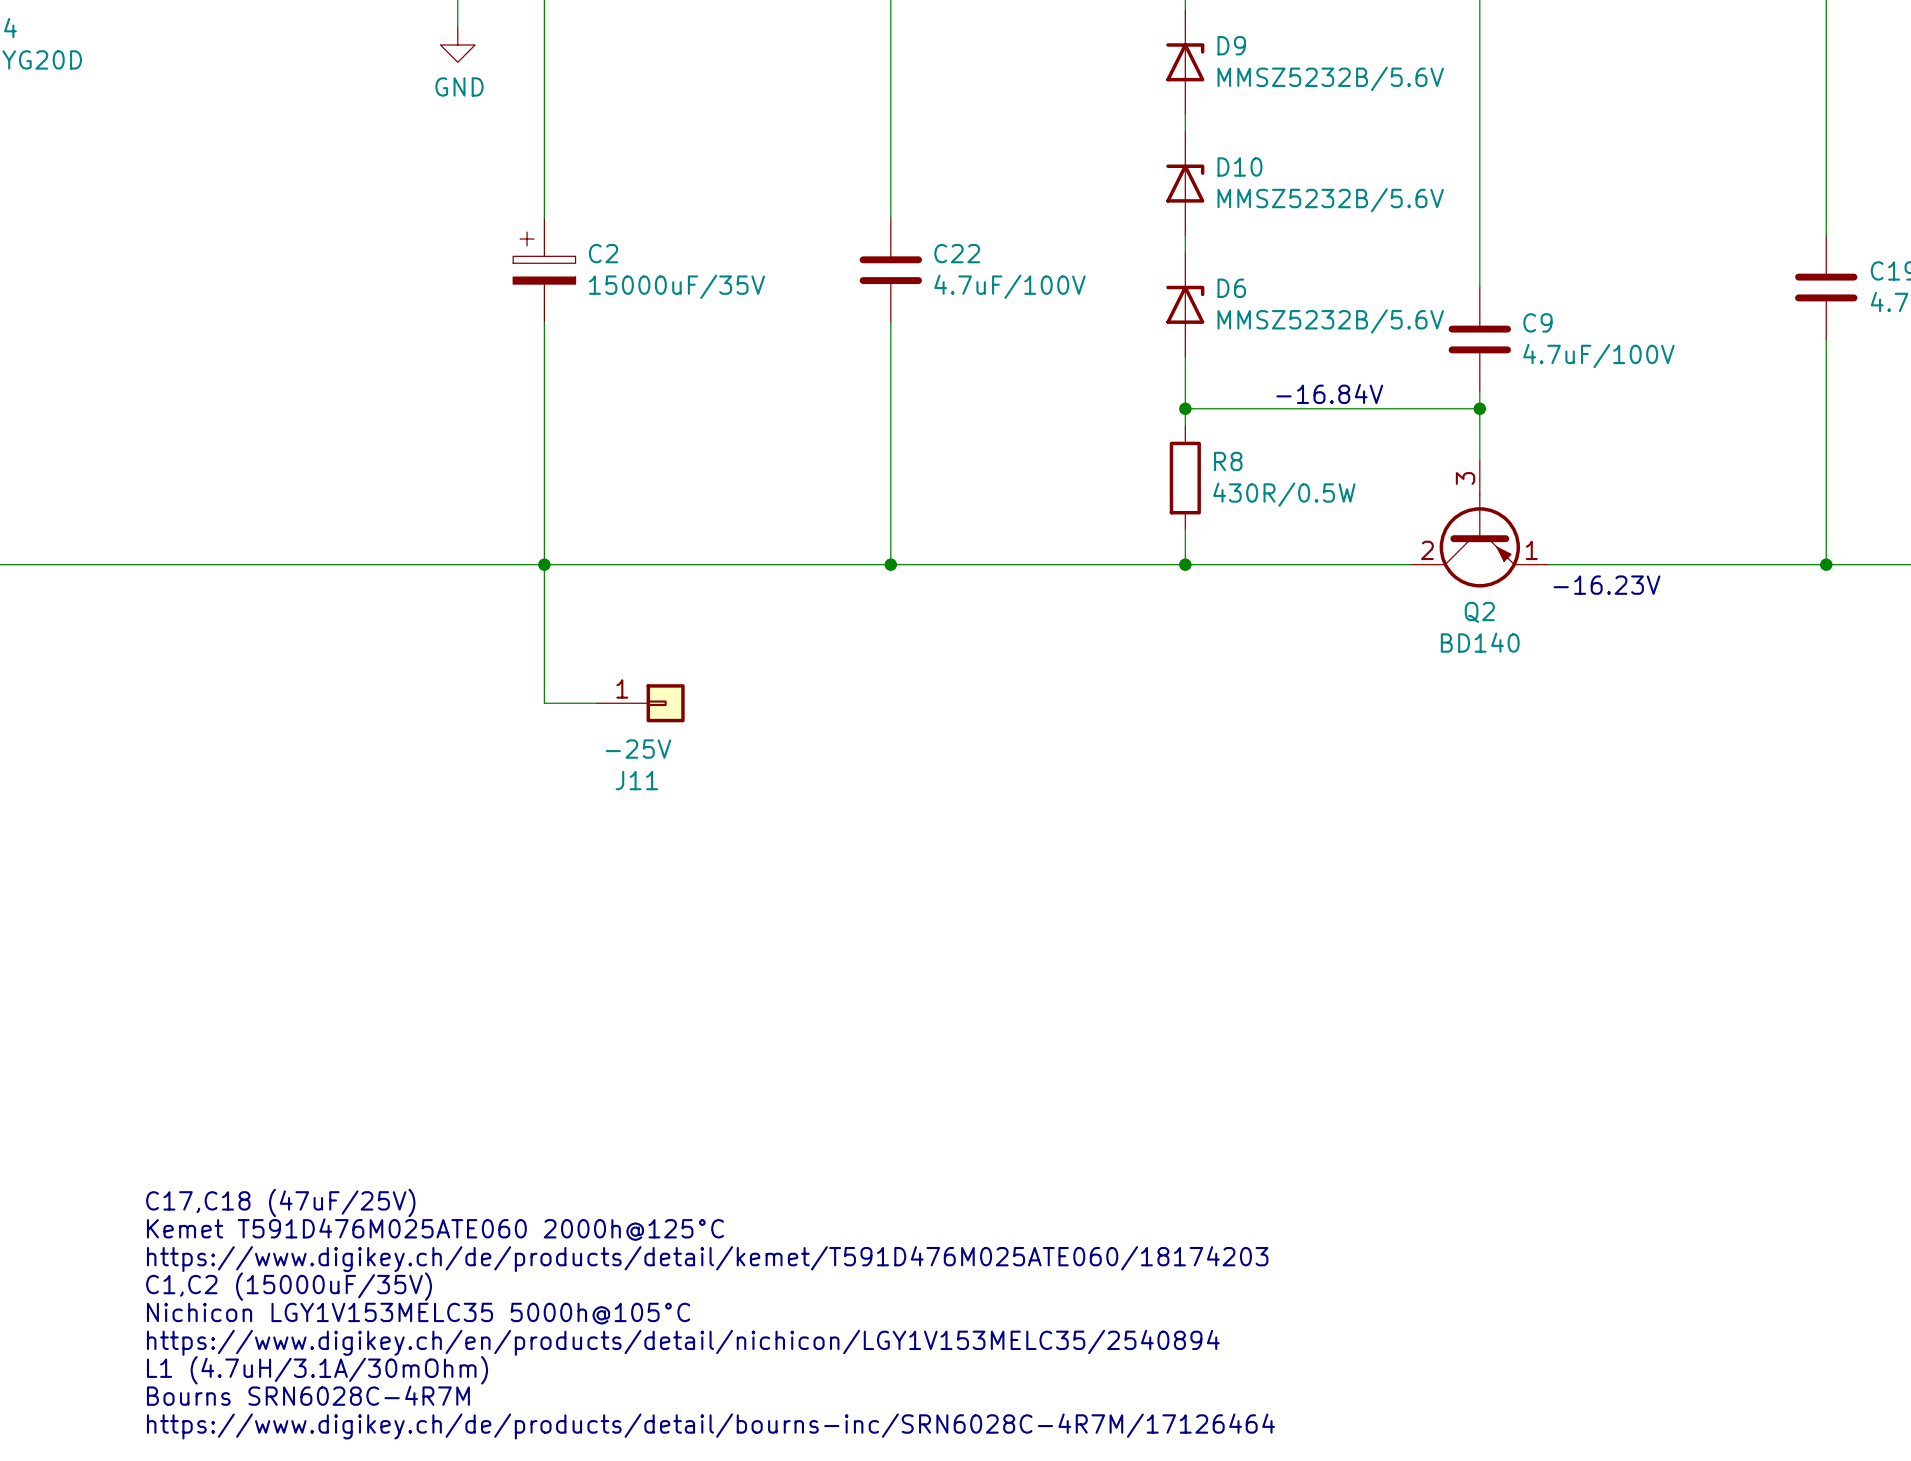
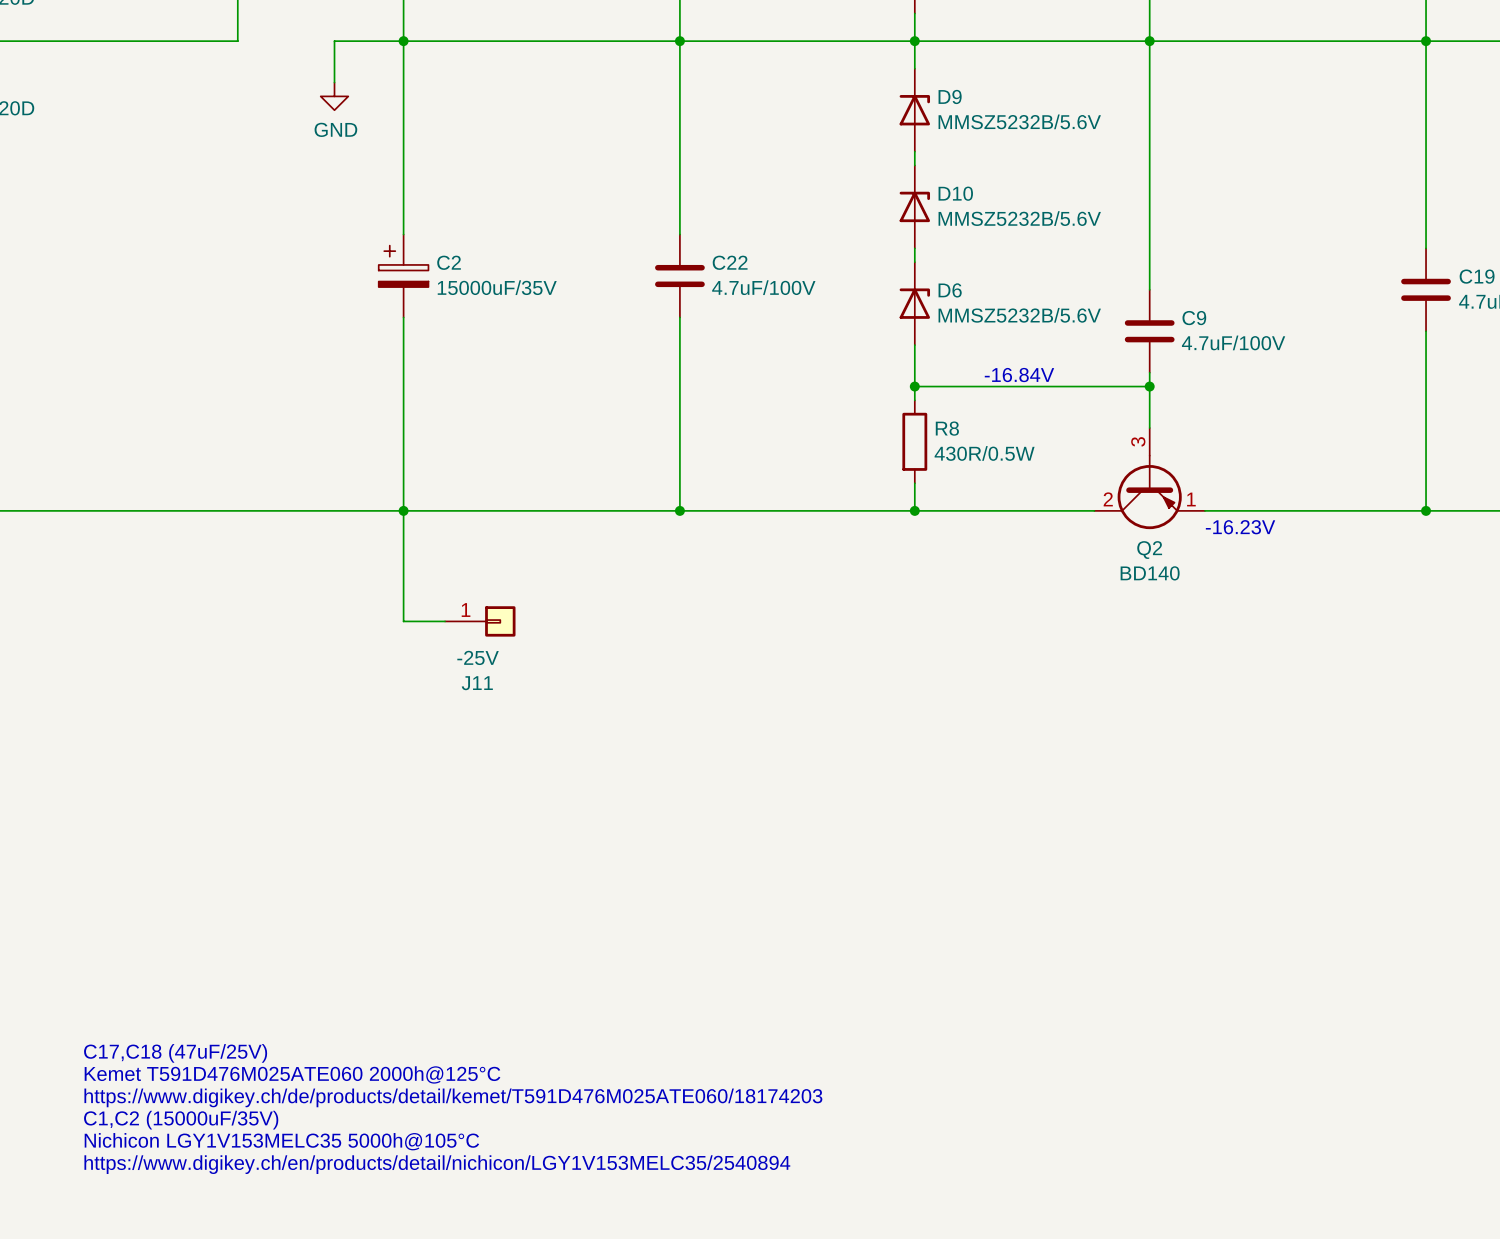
text position: C17,C18 (47uF/25V) (280, 1202) -> C17,C18 (47uF/25V) (175, 1053)
text position: Kemet T591D476M025ATE060 2000h@125°C (435, 1229) -> Kemet T591D476M025ATE060 2000h@125°C (292, 1074)
text position: https://www.digikey.ch/de/products/detail/kemet/T591D476M025ATE060/18174203 (707, 1259) -> https://www.digikey.ch/de/products/detail/kemet/T591D476M025ATE060/18174203 (453, 1097)
text position: C1,C2 (15000uF/35V) (289, 1286) -> C1,C2 (15000uF/35V) (181, 1120)
text position: Nichicon LGY1V153MELC35 5000h@105°C (418, 1313) -> Nichicon LGY1V153MELC35 5000h@105°C (281, 1141)
text position: https://www.digikey.ch/en/products/detail/nichicon/LGY1V153MELC35/2540894 (683, 1342) -> https://www.digikey.ch/en/products/detail/nichicon/LGY1V153MELC35/2540894 (437, 1164)
text: L1 (4.7uH/3.1A/30mOhm) (317, 1370) -> none
text: Bourns SRN6028C-4R7M (308, 1395) -> none
text: https://www.digikey.ch/de/products/detail/bourns-inc/SRN6028C-4R7M/17126464 (710, 1426) -> none

